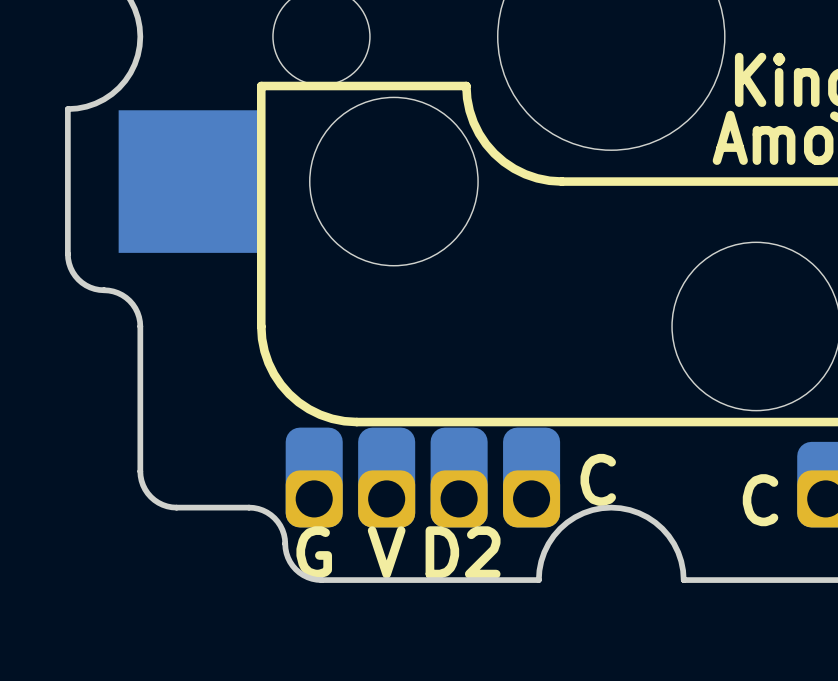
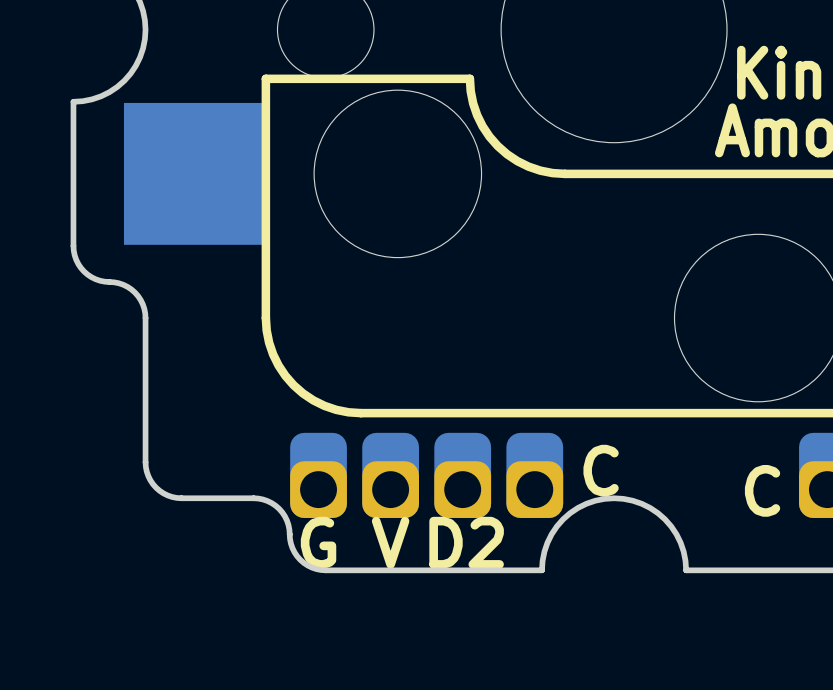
part footprint: [285, 427, 561, 528] -> [290, 432, 564, 518]

